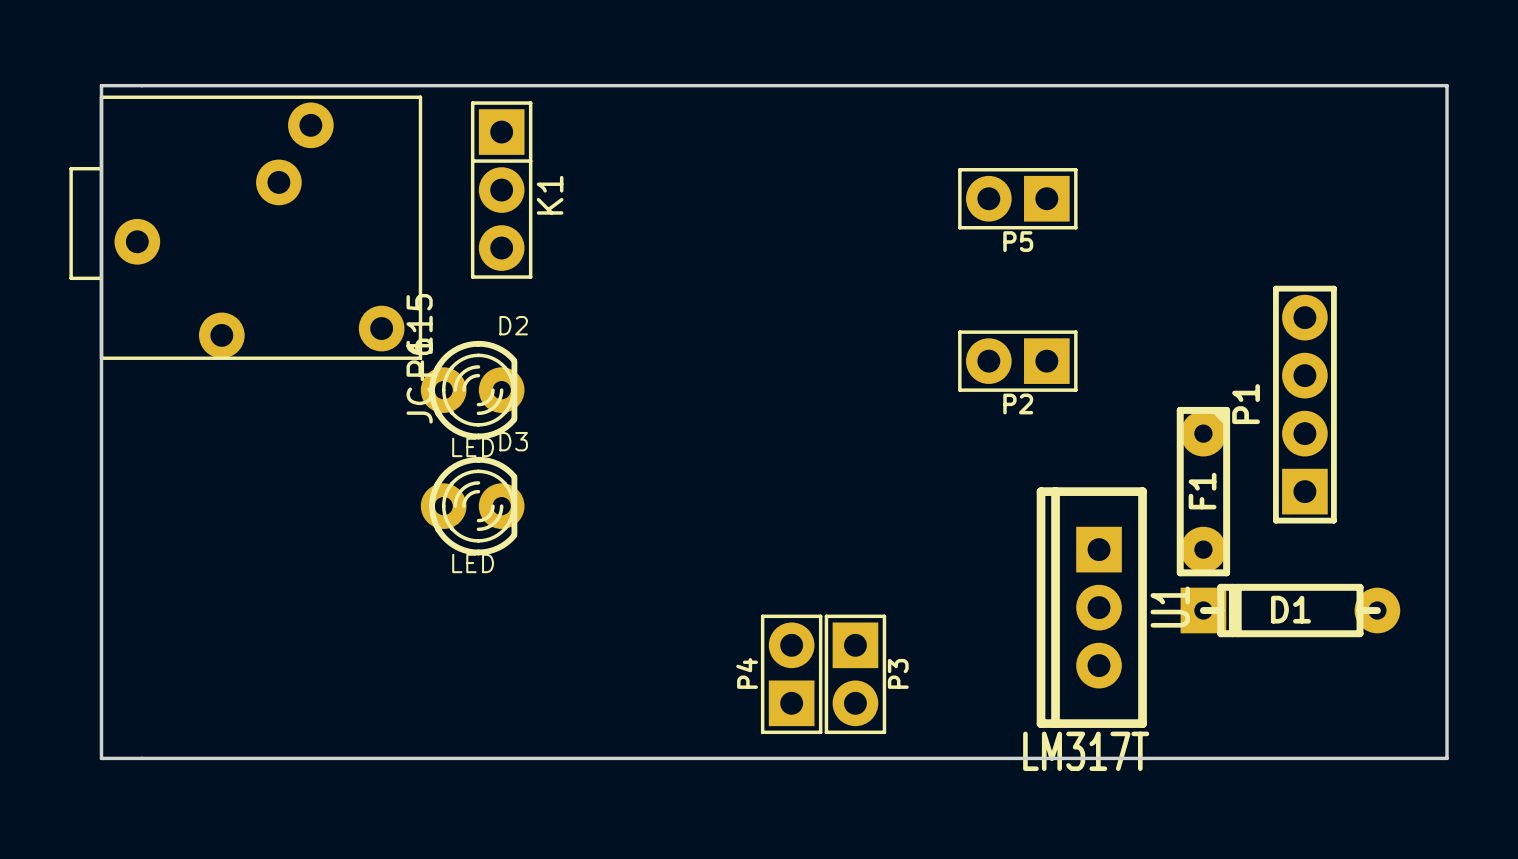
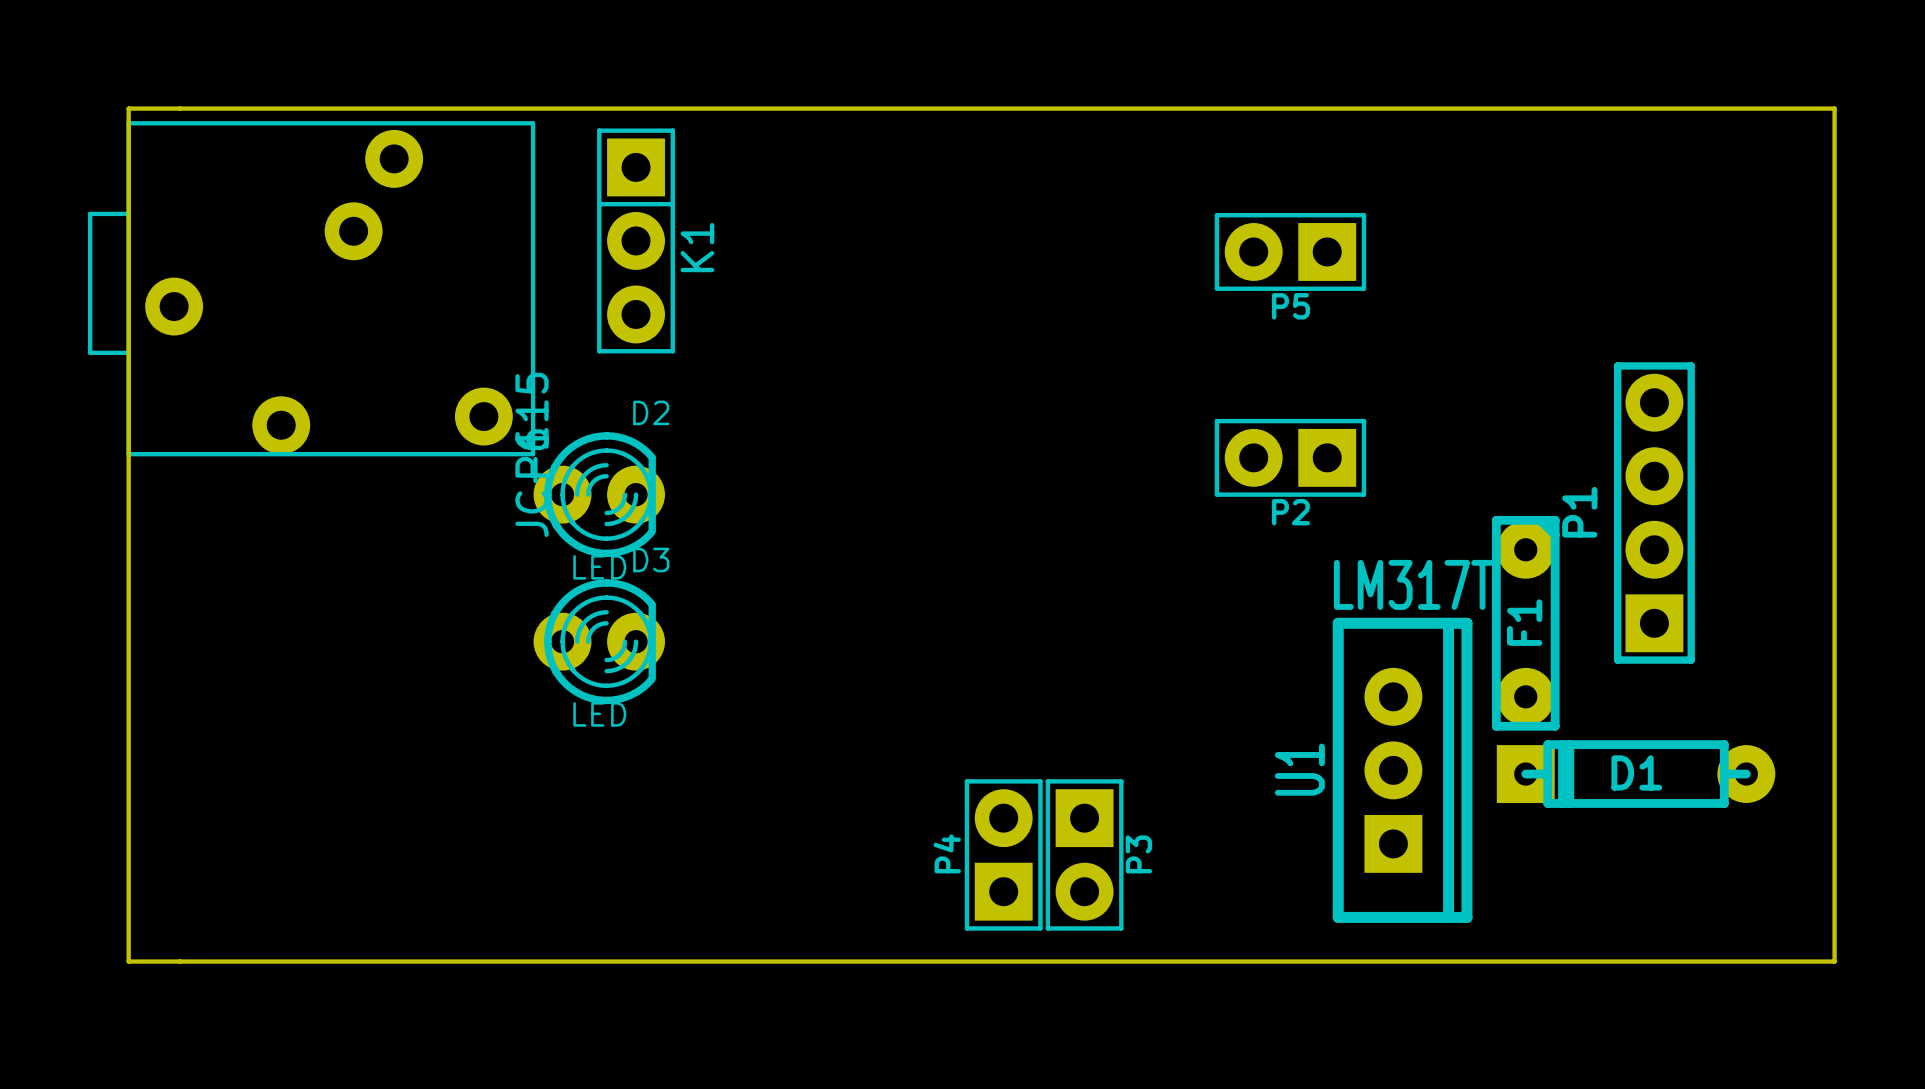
U1 rotation: 0° (1091, 607) -> 180° (1402, 770)

